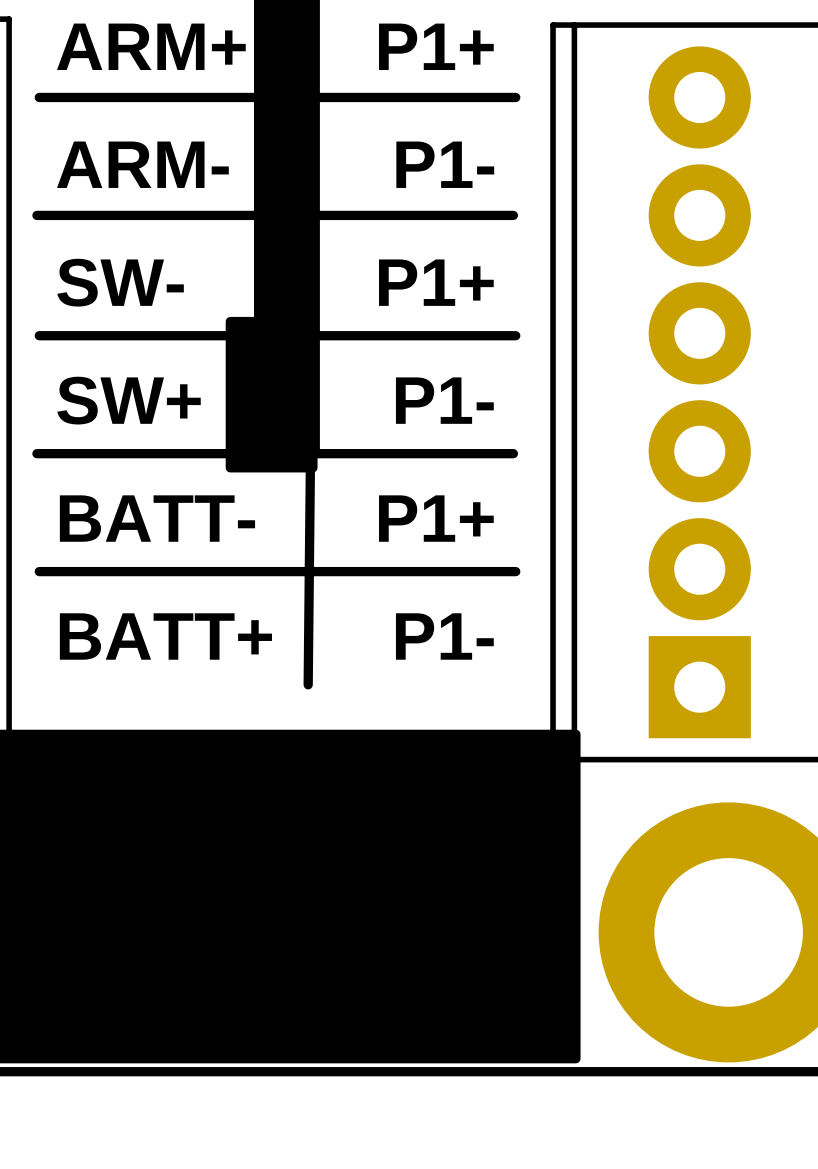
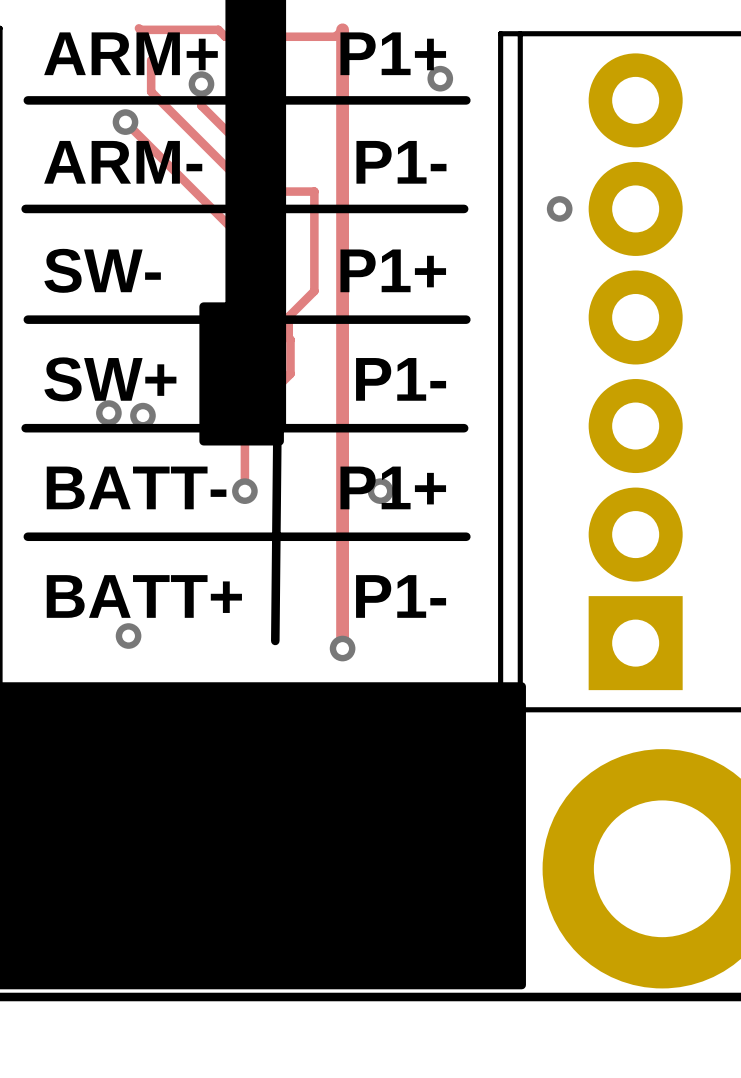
track: none -> (138, 28) (218, 29) (225, 36) (335, 36) (342, 29) (342, 648)
track: none -> (151, 60) (151, 91) (250, 191) (314, 191) (314, 291) (288, 316) (290, 373) (250, 414) (250, 420) (244, 426) (244, 491)
via: none -> (440, 78)
track: none -> (201, 84) (201, 105) (239, 143)
via: none -> (201, 84)
track: none -> (125, 122) (236, 232) (241, 232) (247, 226) (280, 226)
via: none -> (125, 122)
via: none -> (559, 208)
via: none -> (108, 413)
via: none -> (142, 415)
via: none -> (244, 491)
via: none -> (380, 491)
via: none -> (128, 636)
via: none -> (342, 648)

